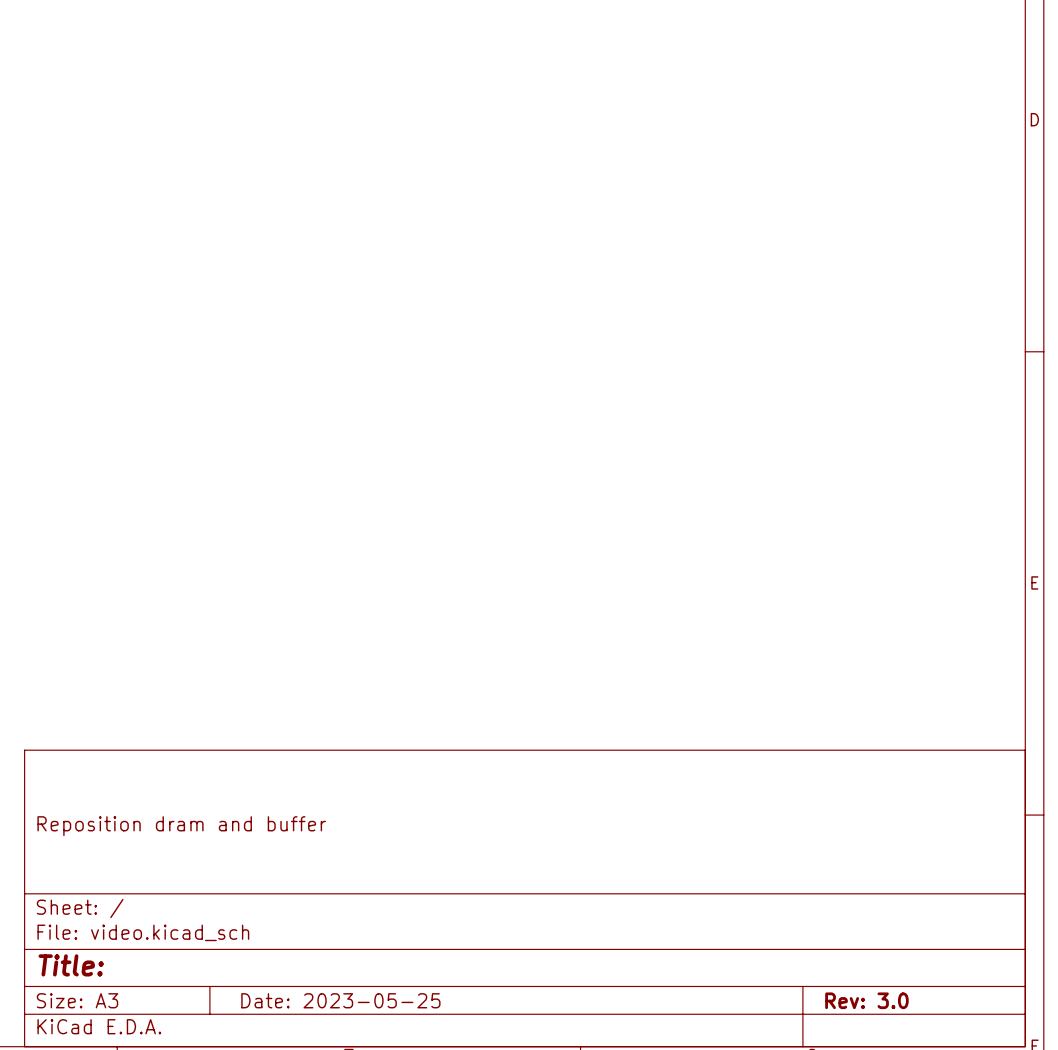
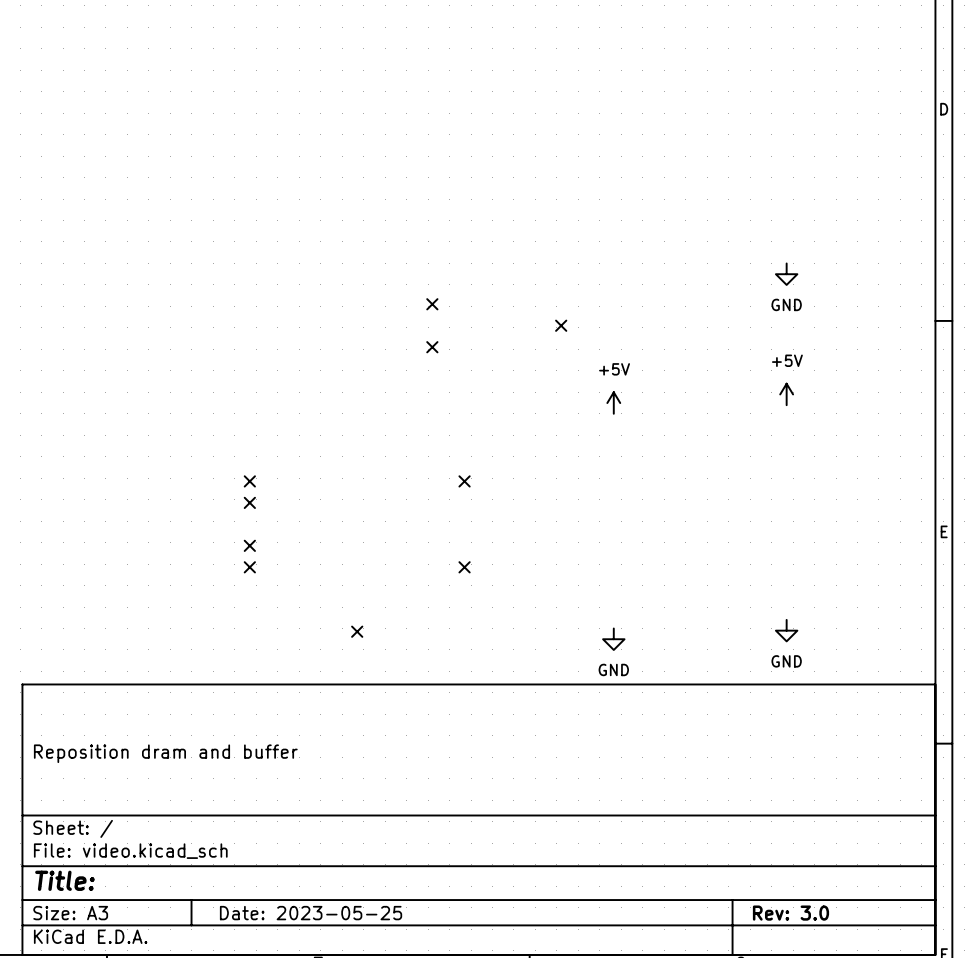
power symbol: none -> GND (786, 274)
no-connect mark: none -> (432, 304)
no-connect mark: none -> (561, 325)
no-connect mark: none -> (432, 347)
power symbol: none -> +5V (786, 394)
power symbol: none -> +5V (613, 403)
no-connect mark: none -> (249, 481)
no-connect mark: none -> (464, 481)
no-connect mark: none -> (249, 502)
no-connect mark: none -> (249, 545)
no-connect mark: none -> (249, 567)
no-connect mark: none -> (464, 567)
power symbol: none -> GND (786, 630)
no-connect mark: none -> (357, 631)
power symbol: none -> GND (613, 639)

